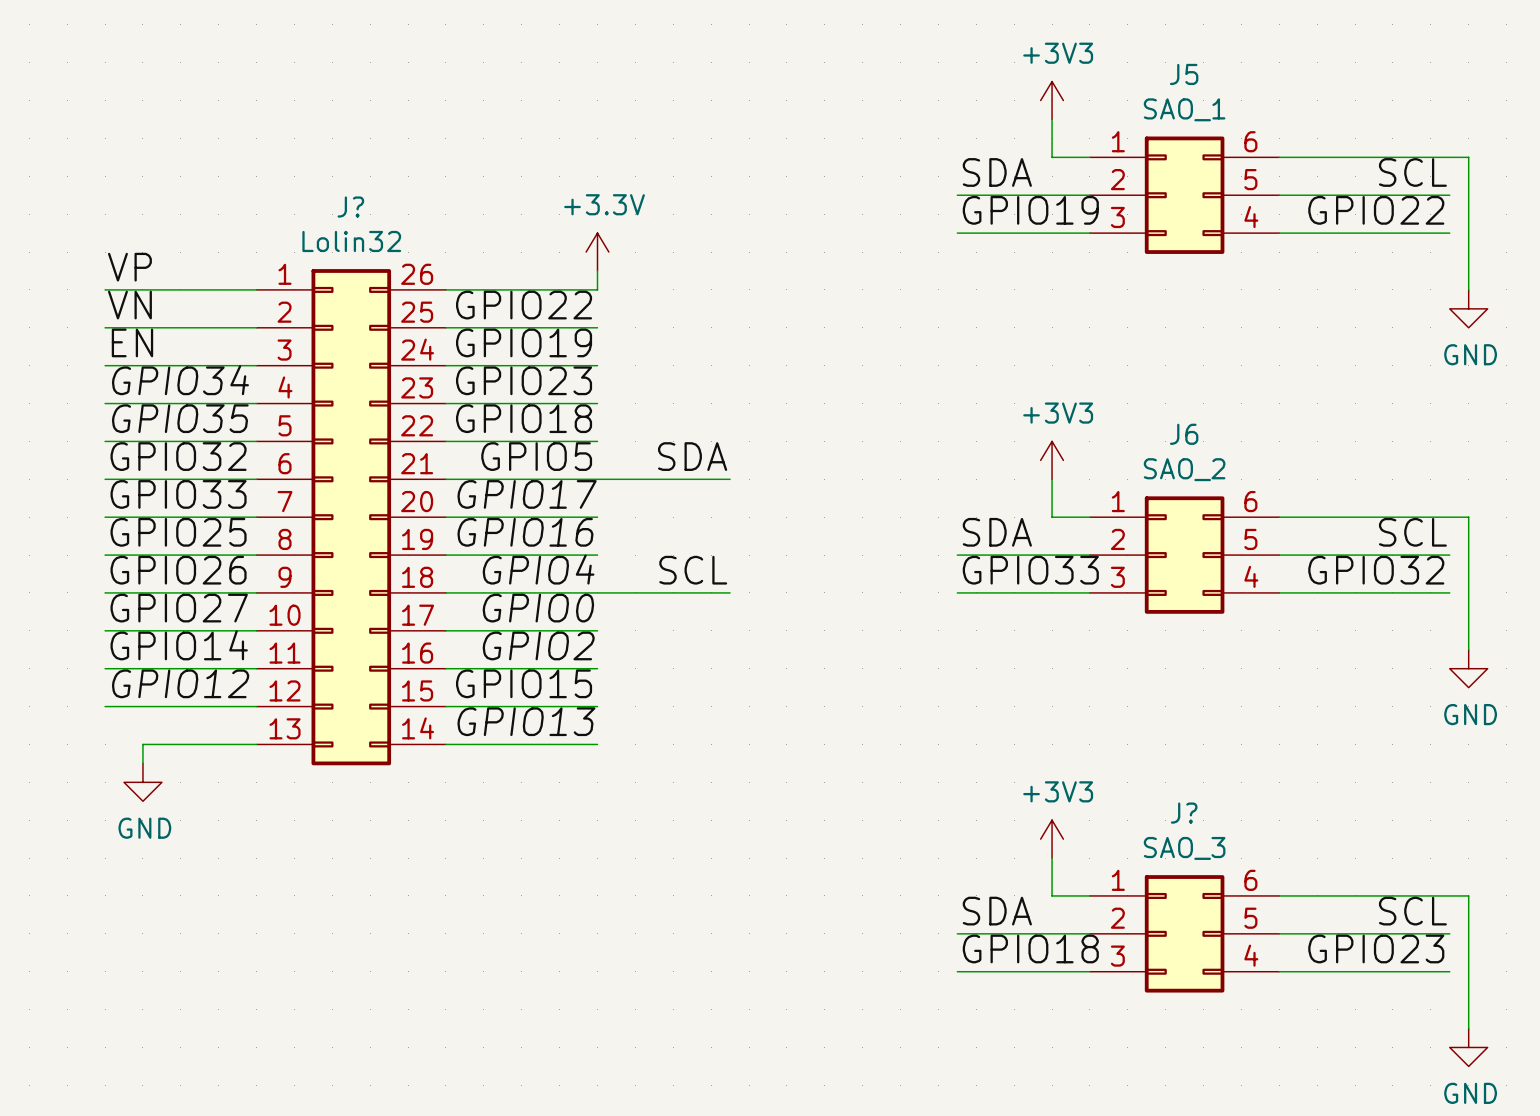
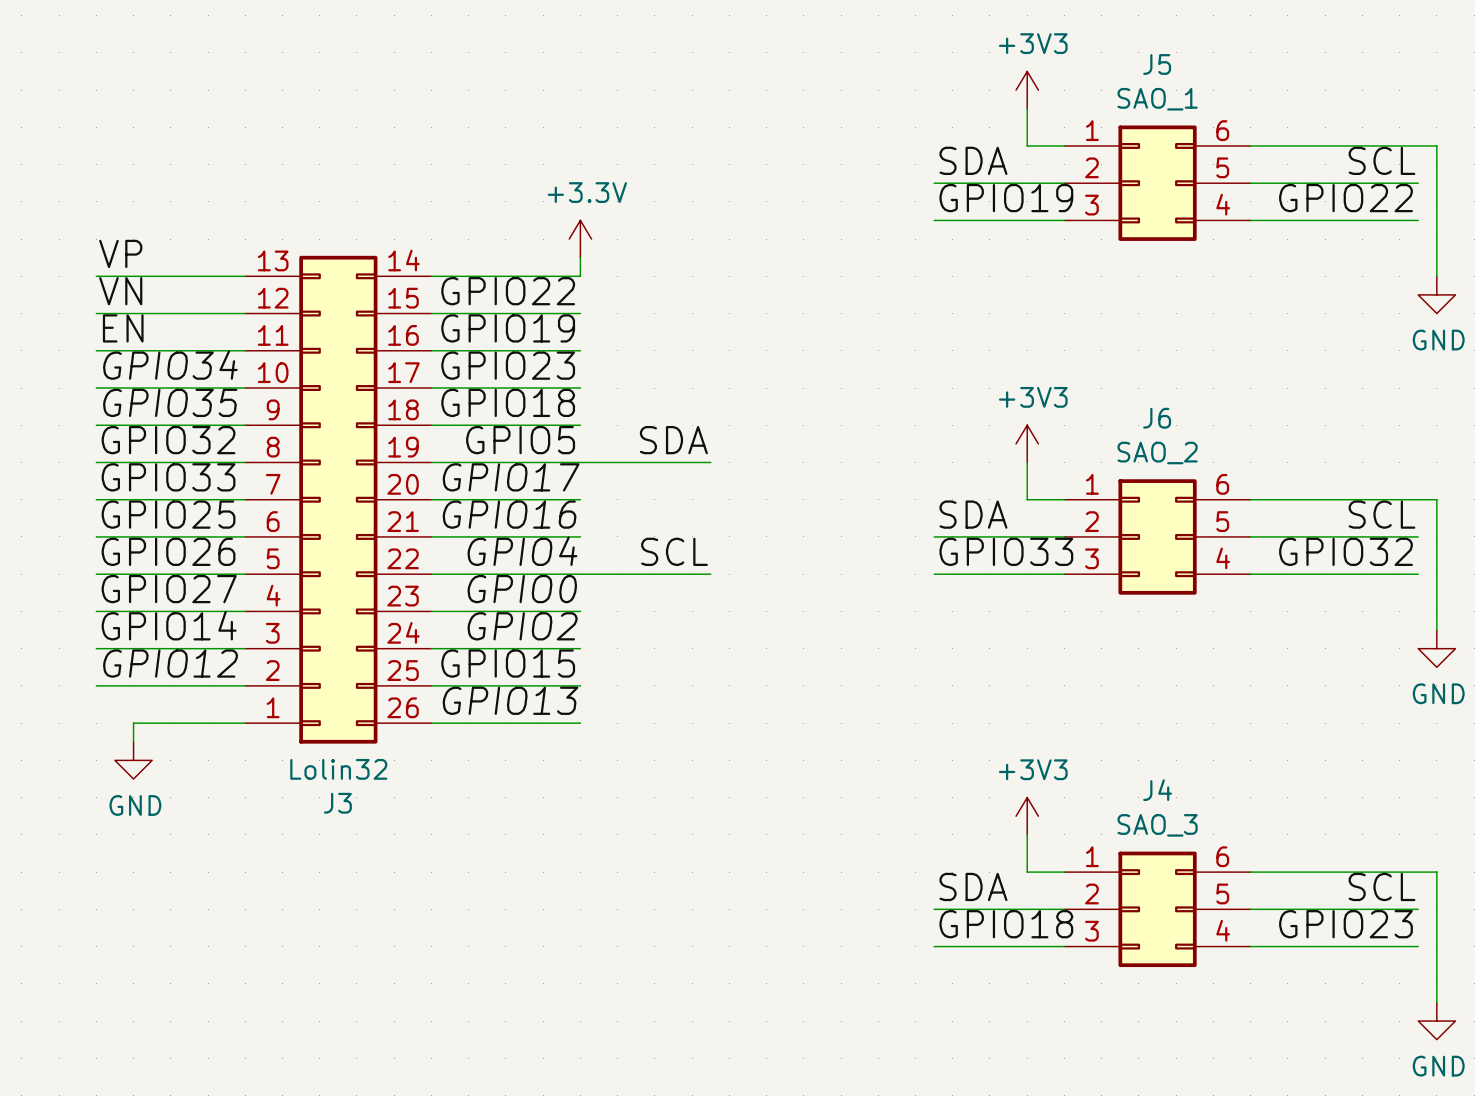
J? name: J? (350, 207) -> J3 (337, 803)
J? flip: as is (351, 517) -> up-down (338, 499)
J? name: J? (1184, 813) -> J4 (1157, 790)

